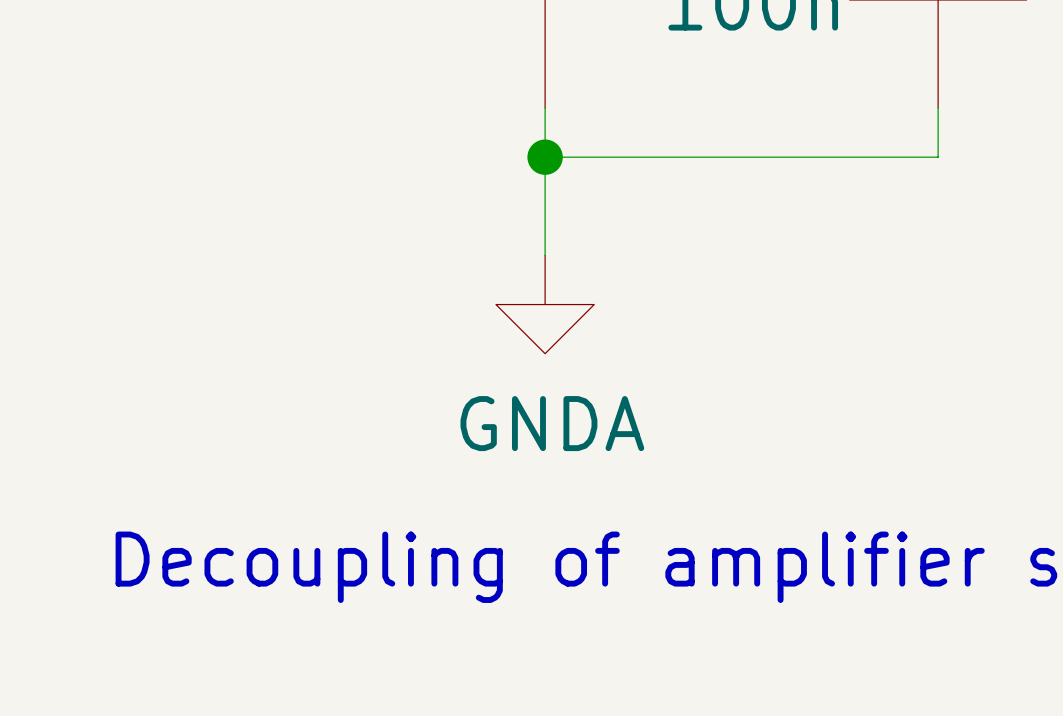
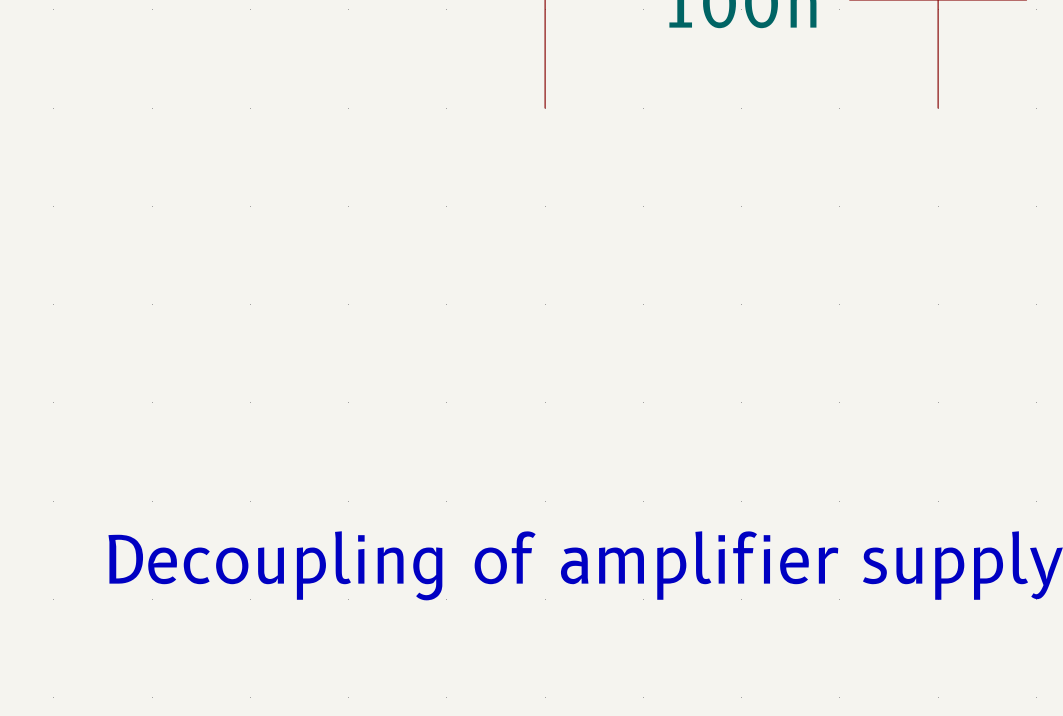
wire: (545, 108) (545, 255) -> none
wire: (938, 108) (938, 157) (545, 157) -> none
junction: (545, 157) -> none
power symbol: GNDA (545, 304) -> none

